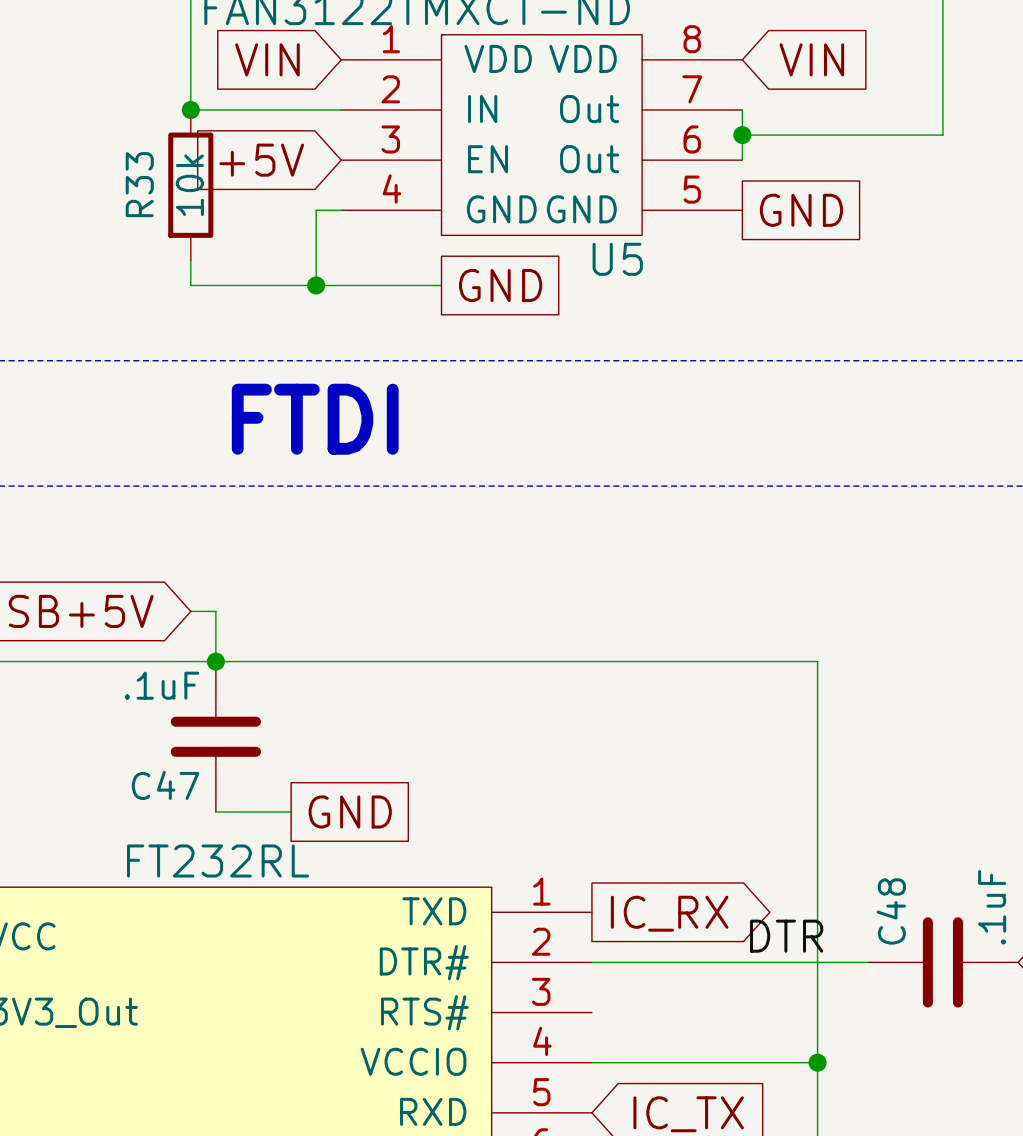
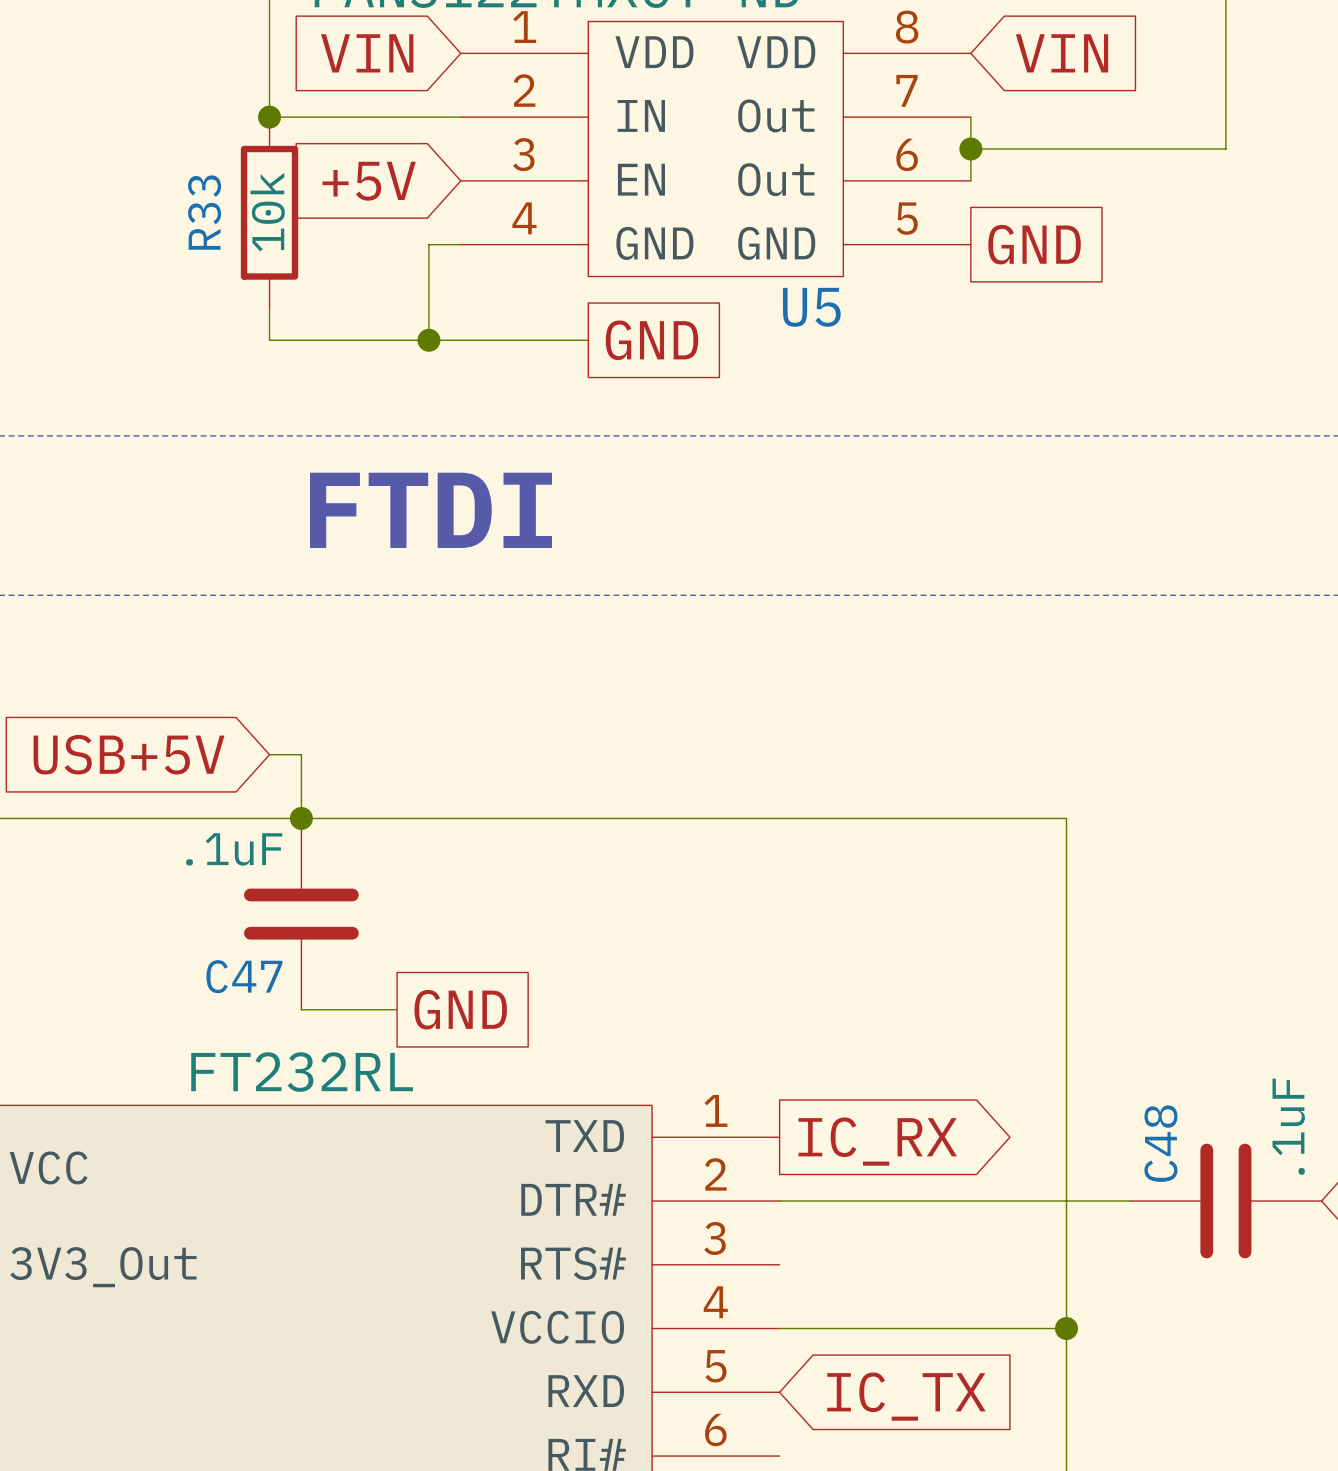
label: DTR (786, 936) -> none

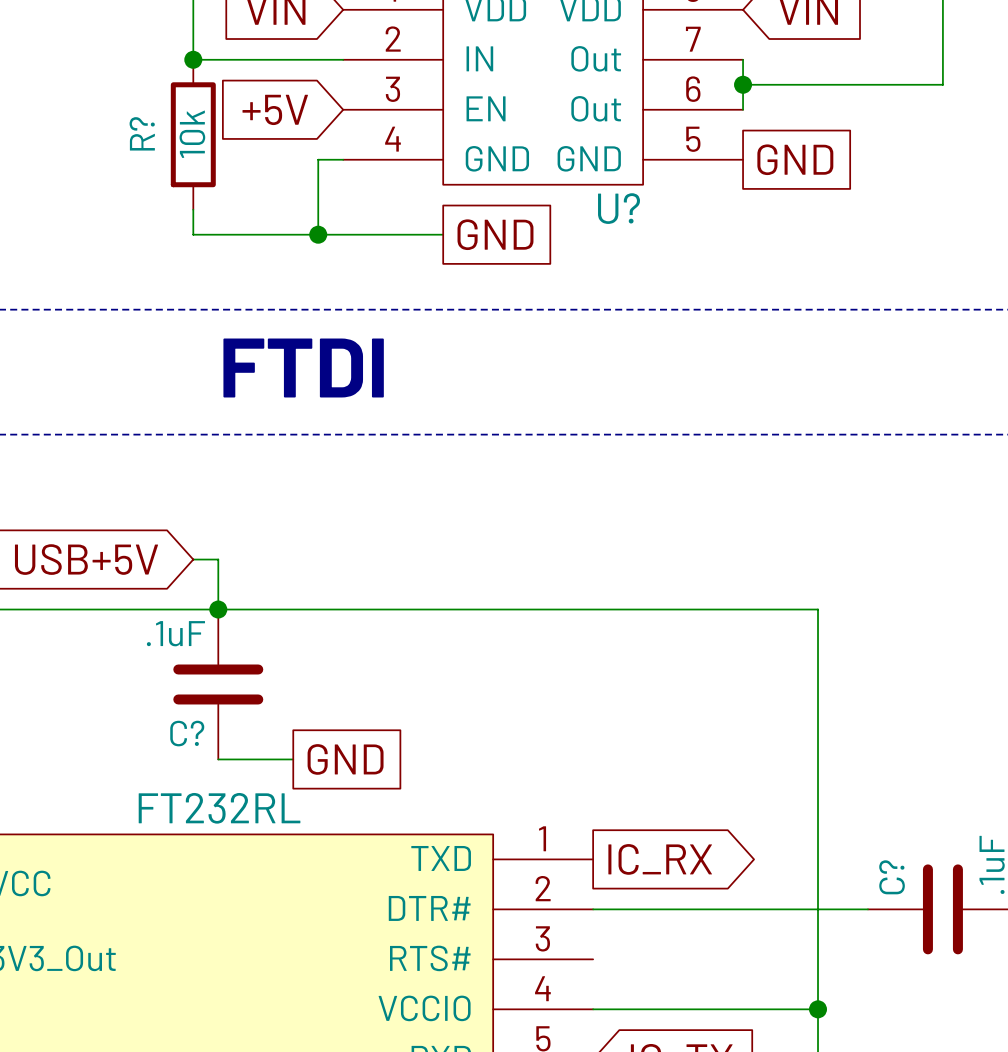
R33 name: R33 (204, 212) -> R? (142, 133)
U5 name: U5 (811, 307) -> U? (619, 208)
C47 name: C47 (244, 976) -> C? (187, 733)
C48 name: C48 (1160, 1143) -> C? (892, 877)

